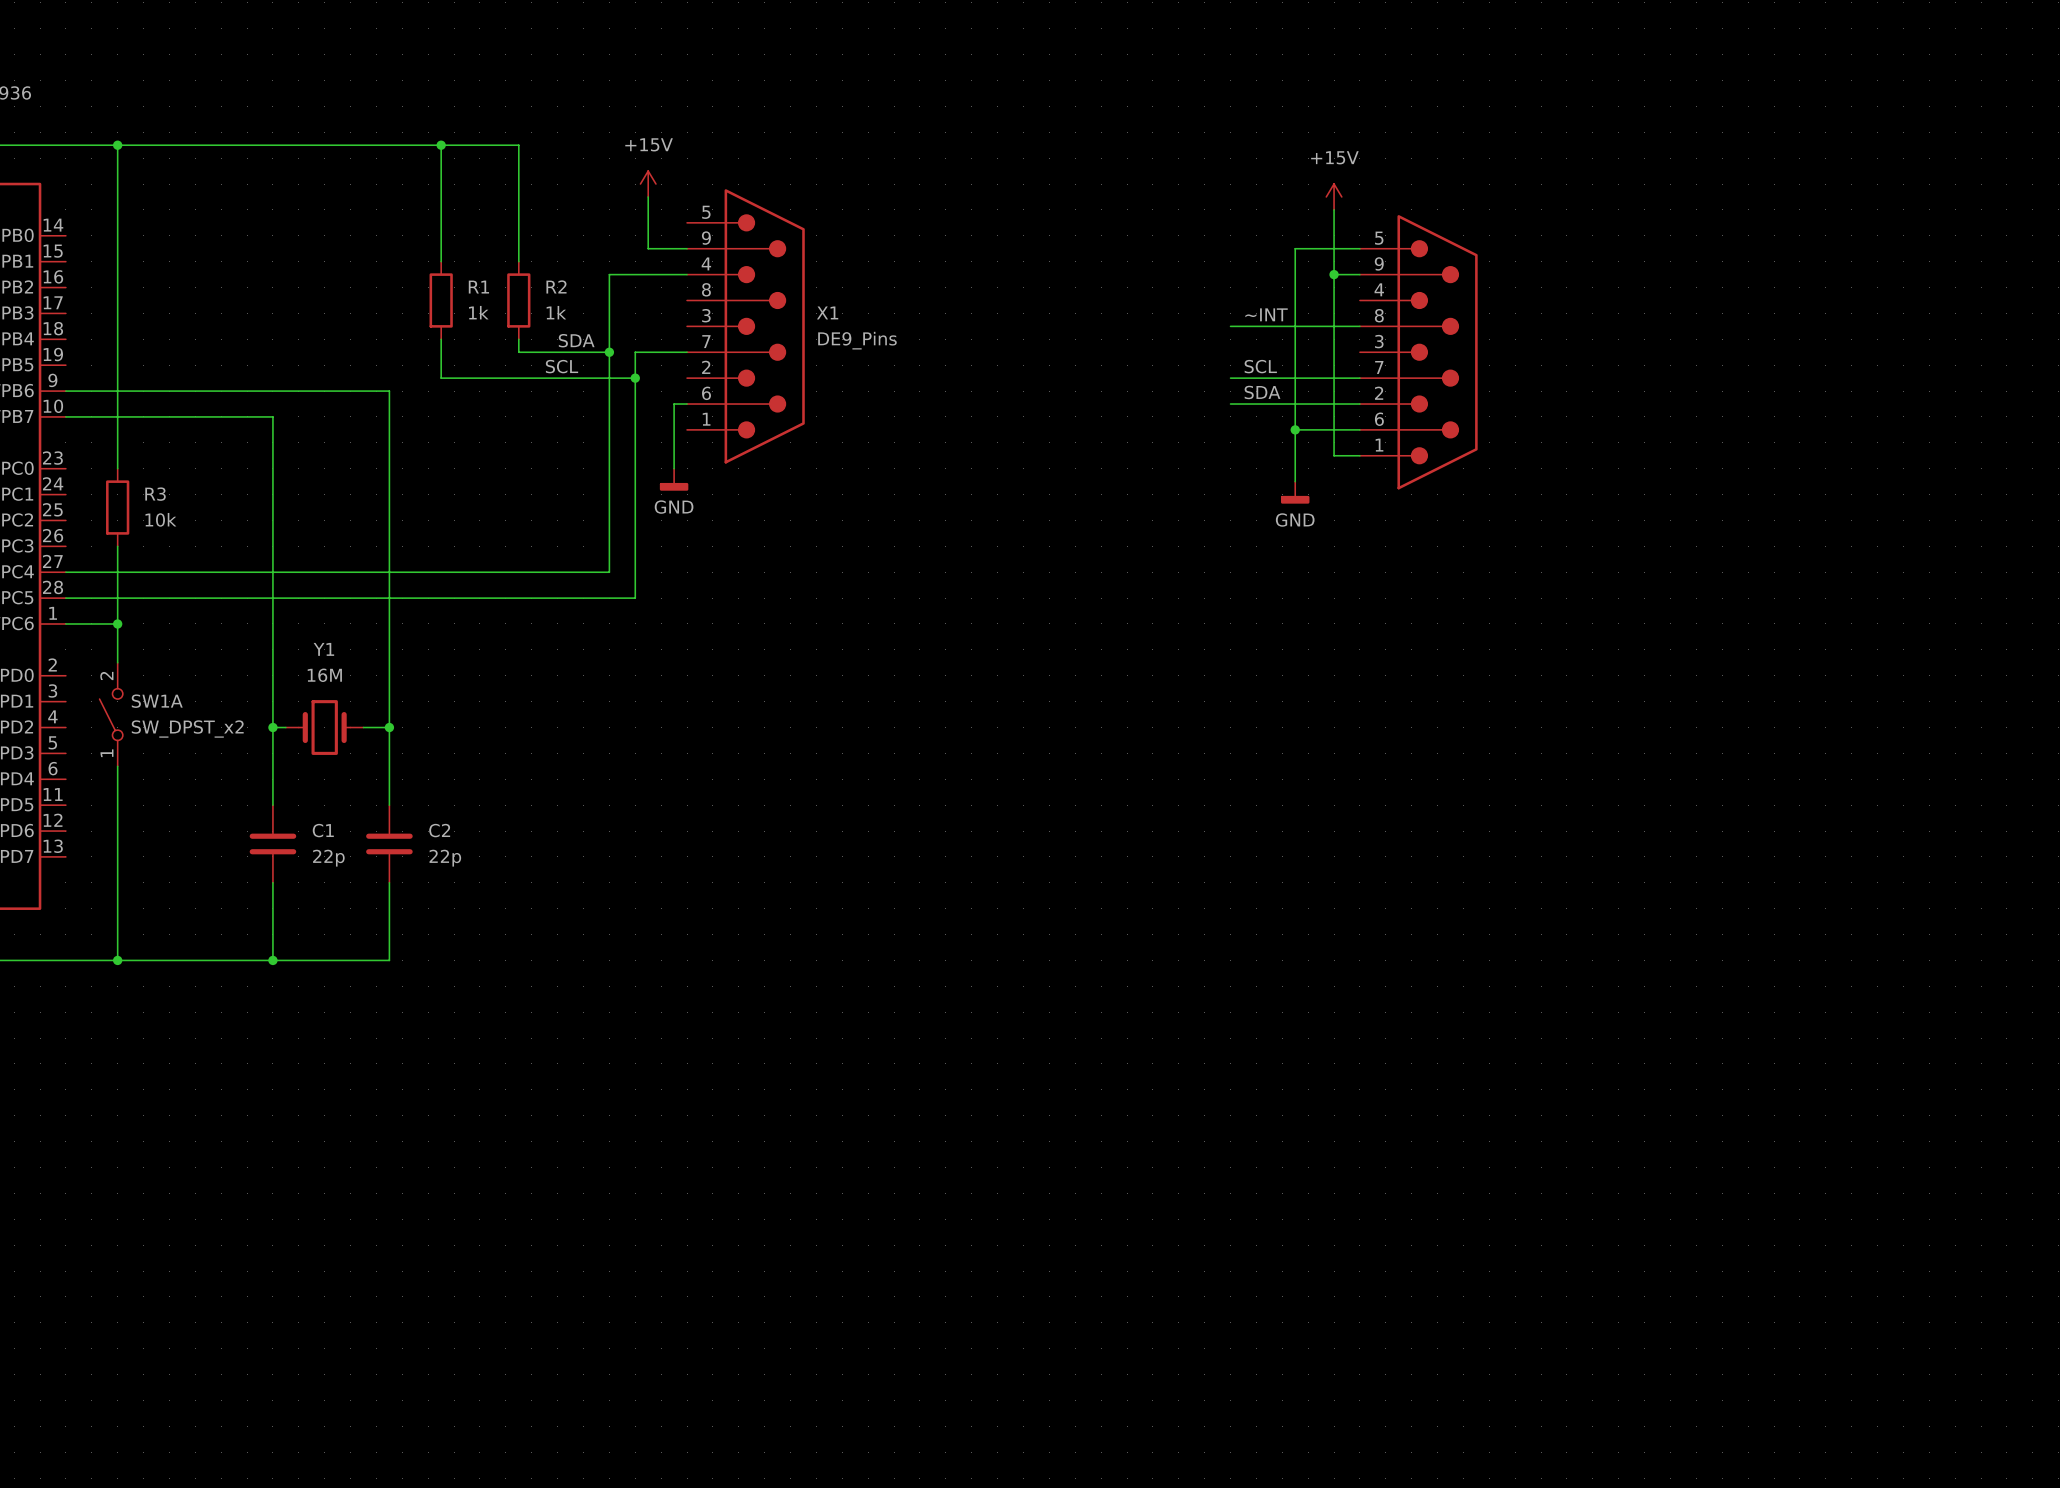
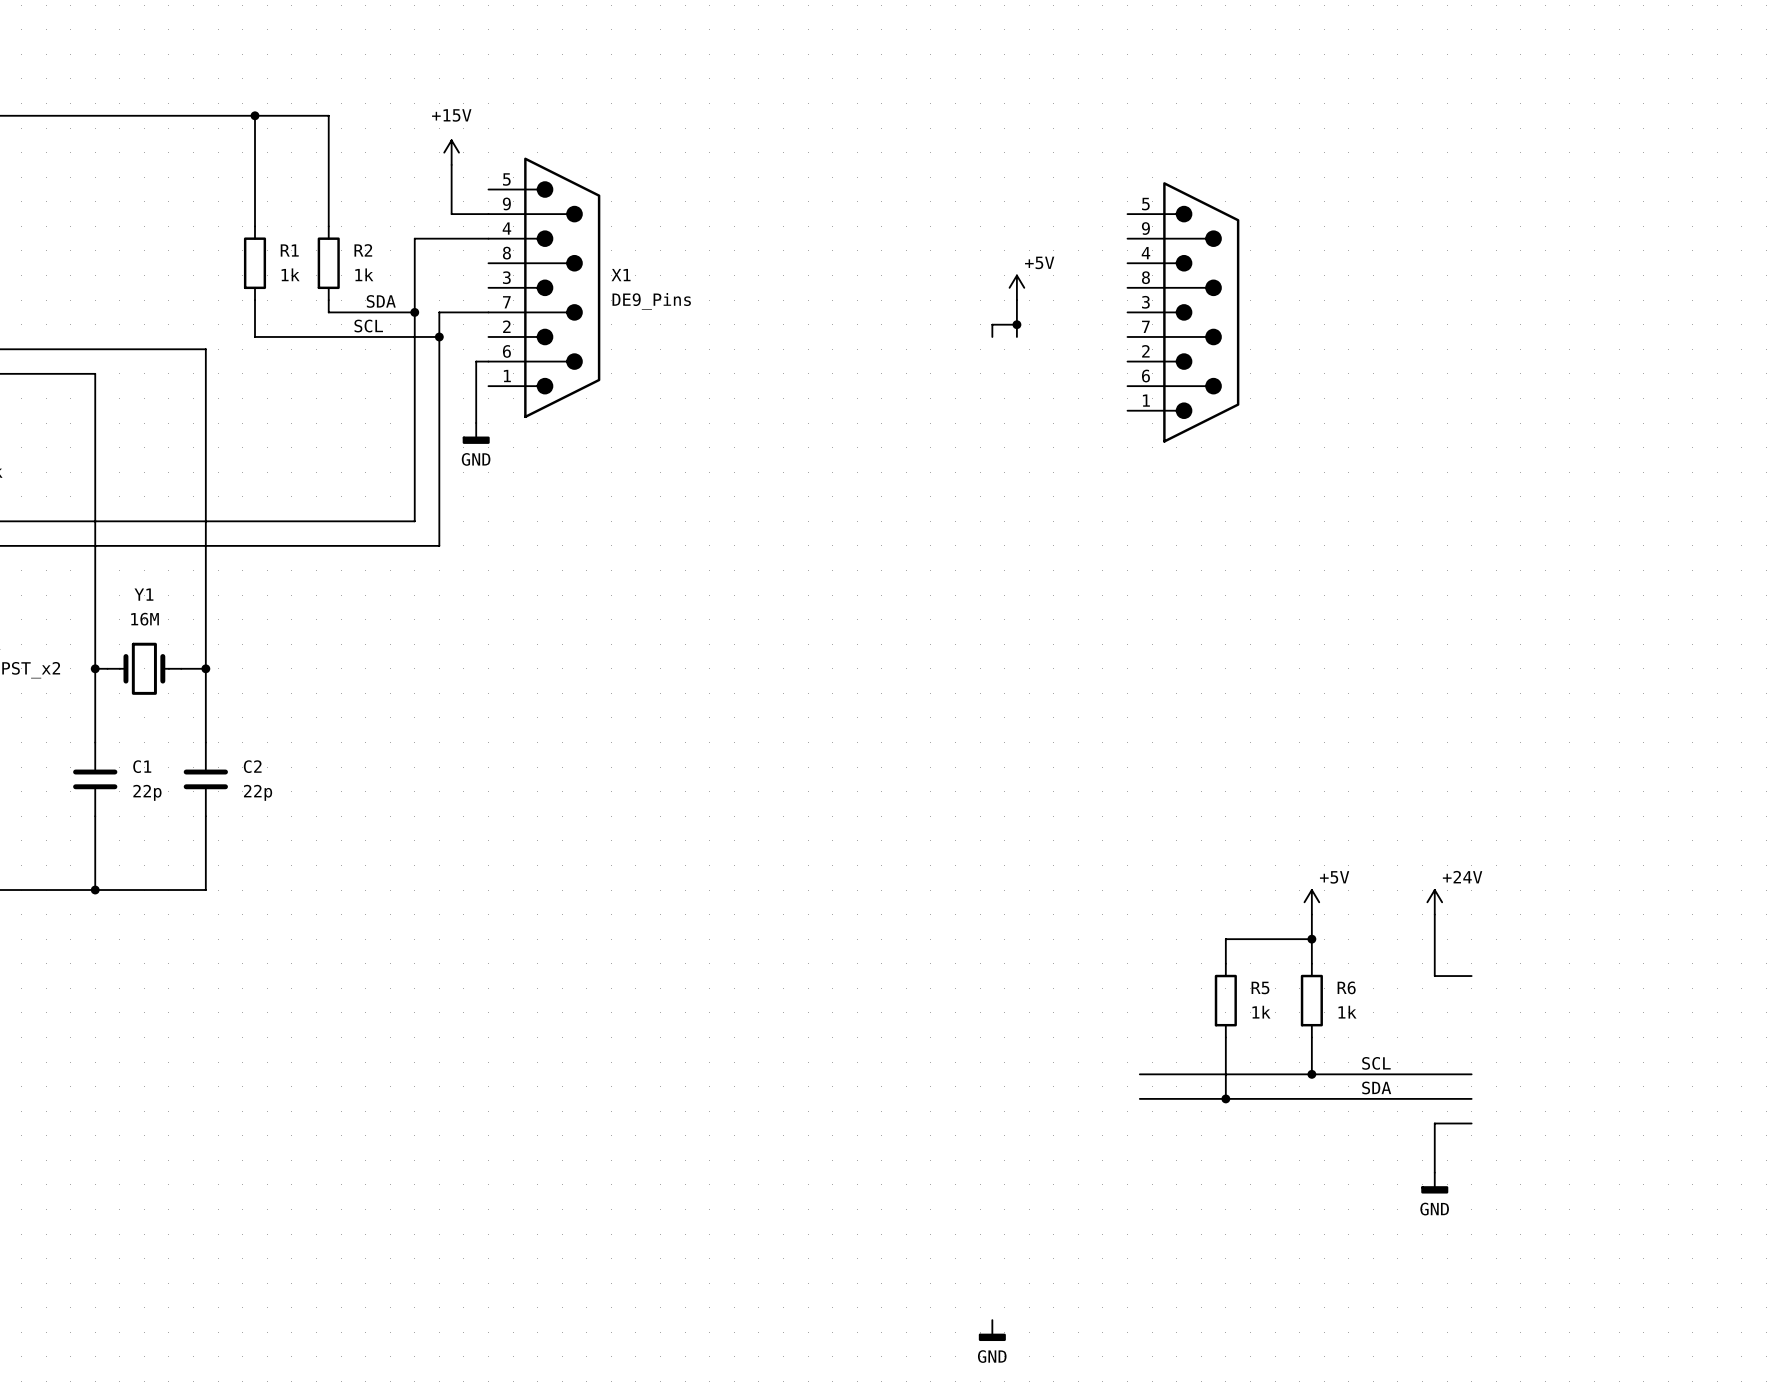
power symbol: +15V (1334, 196) -> none
wire: (1334, 209) (1334, 455) (1359, 455) -> none
wire: (1359, 248) (1295, 248) (1295, 481) -> none
wire: (1334, 274) (1359, 274) -> none
junction: (1334, 274) -> none
label: ~INT (1266, 314) -> none
wire: (1230, 326) (1359, 326) -> none
power symbol: none -> +5V (1016, 287)
wire: none -> (1016, 300) (1016, 336)
wire: none -> (1016, 324) (992, 324) (992, 336)
junction: none -> (1016, 324)
label: SCL (1260, 366) -> none
wire: (1230, 378) (1359, 378) -> none
label: SDA (1262, 392) -> none
wire: (1230, 404) (1359, 404) -> none
wire: (1295, 429) (1359, 429) -> none
junction: (1295, 429) -> none
power symbol: GND (1295, 492) -> none
power symbol: none -> +5V (1311, 902)
power symbol: none -> +24V (1434, 902)
wire: none -> (1311, 914) (1311, 963)
wire: none -> (1434, 914) (1434, 976) (1471, 976)
wire: none -> (1311, 939) (1225, 939) (1225, 963)
junction: none -> (1311, 939)
R5: none -> 1k (1225, 1000)
R6: none -> 1k (1311, 1000)
wire: none -> (1225, 1037) (1225, 1098)
wire: none -> (1311, 1037) (1311, 1074)
label: none -> SCL (1376, 1063)
wire: none -> (1139, 1074) (1471, 1074)
junction: none -> (1311, 1074)
label: none -> SDA (1376, 1087)
wire: none -> (1139, 1098) (1471, 1098)
junction: none -> (1225, 1098)
wire: none -> (1471, 1123) (1434, 1123) (1434, 1172)
power symbol: none -> GND (1434, 1183)
power symbol: none -> GND (992, 1330)

